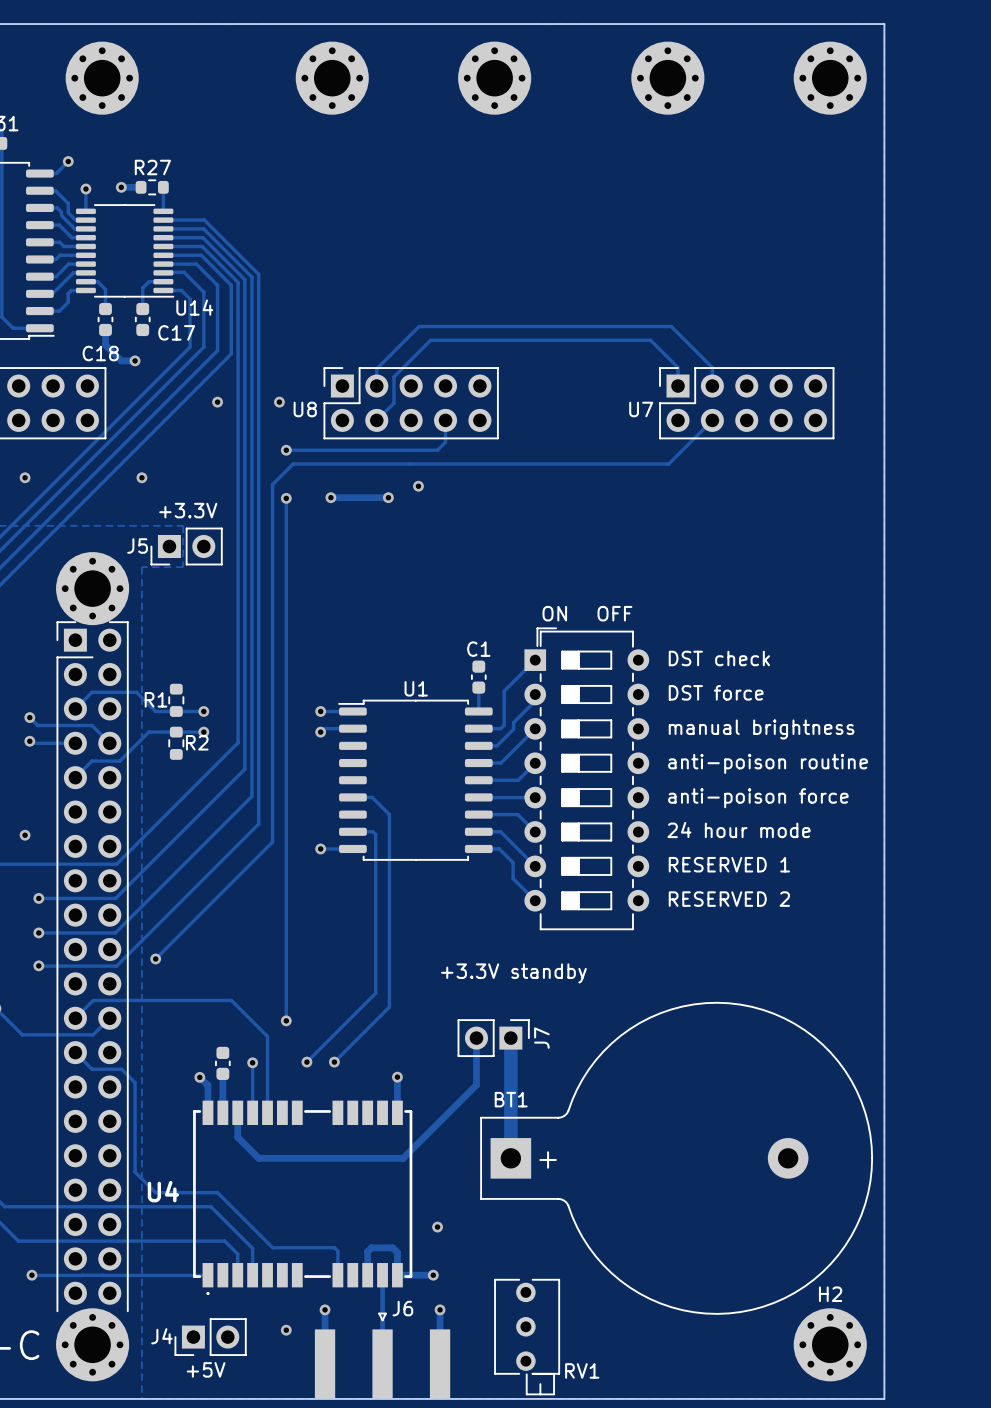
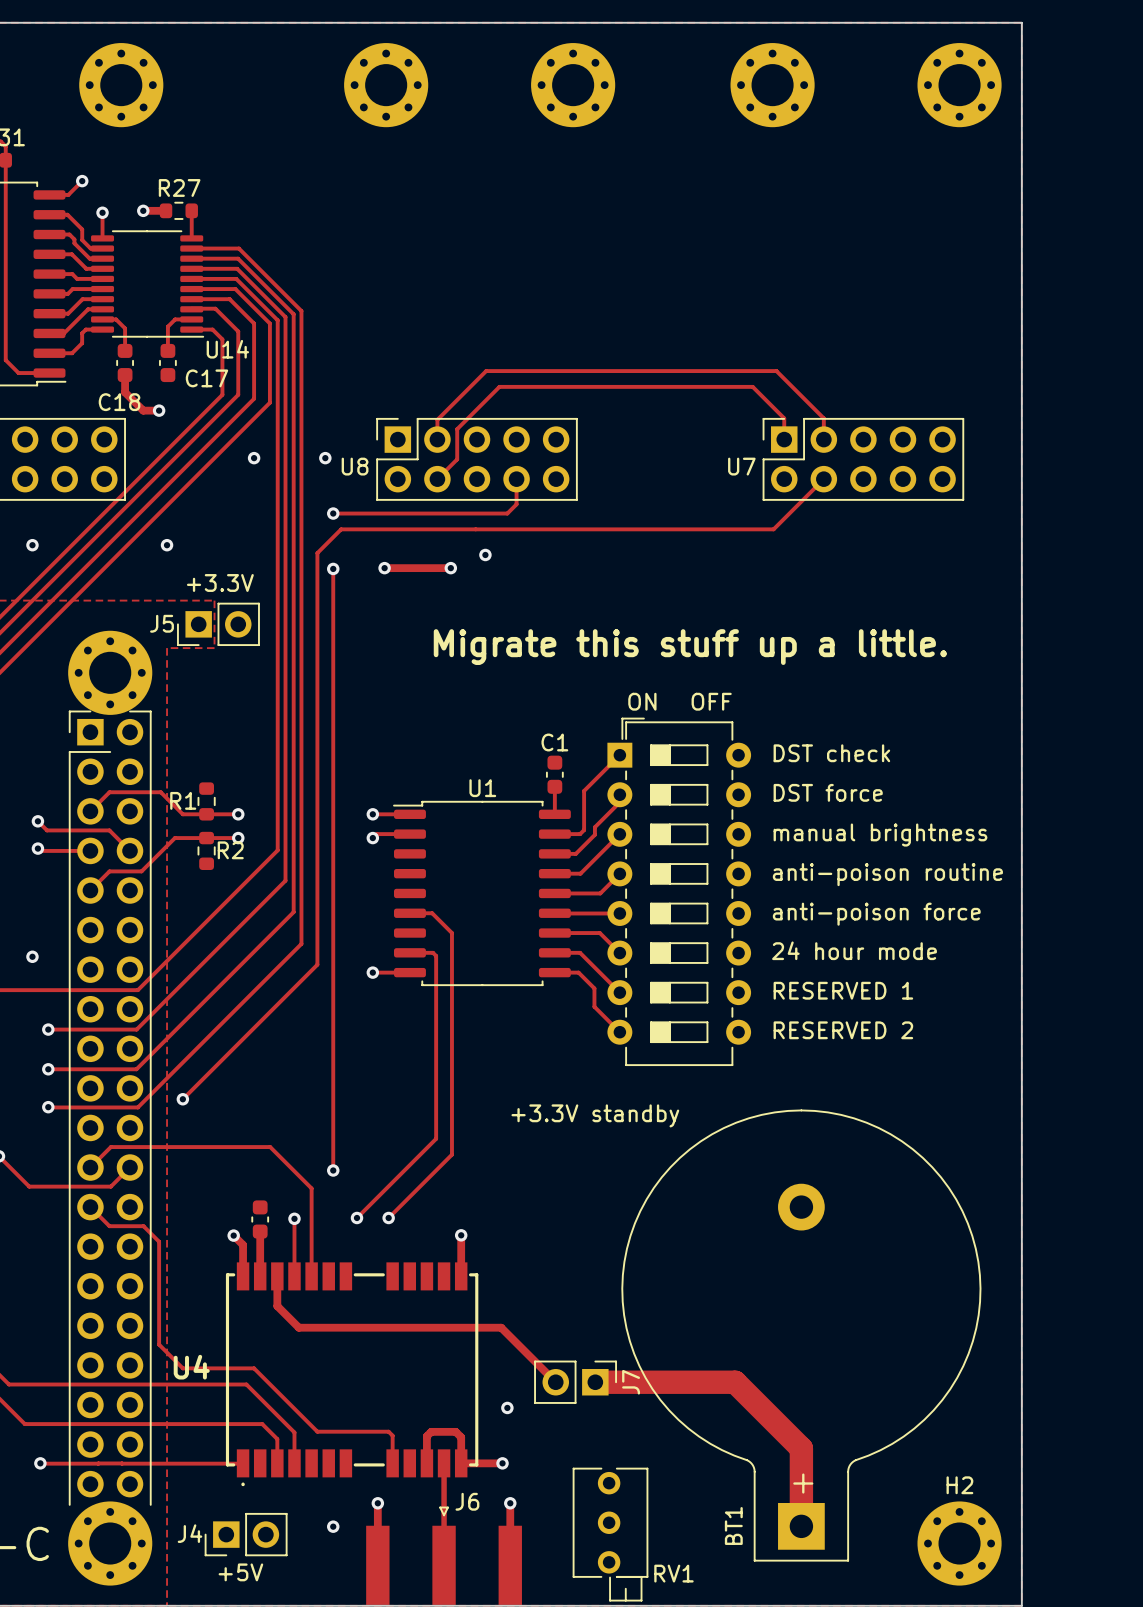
text: none -> Migrate this stuff up a little. (690, 647)
track: (476, 1038) (476, 1085) (403, 1158) (258, 1158) (237, 1137) -> (555, 1382) (501, 1327) (298, 1327) (277, 1304)
J7 position: (493, 1038) -> (575, 1382)
track: (510, 1038) (510, 1158) -> none
BT1 rotation: 0° (676, 1158) -> 90° counterclockwise (801, 1335)
track: none -> (595, 1382) (735, 1382) (801, 1448) (801, 1526)

